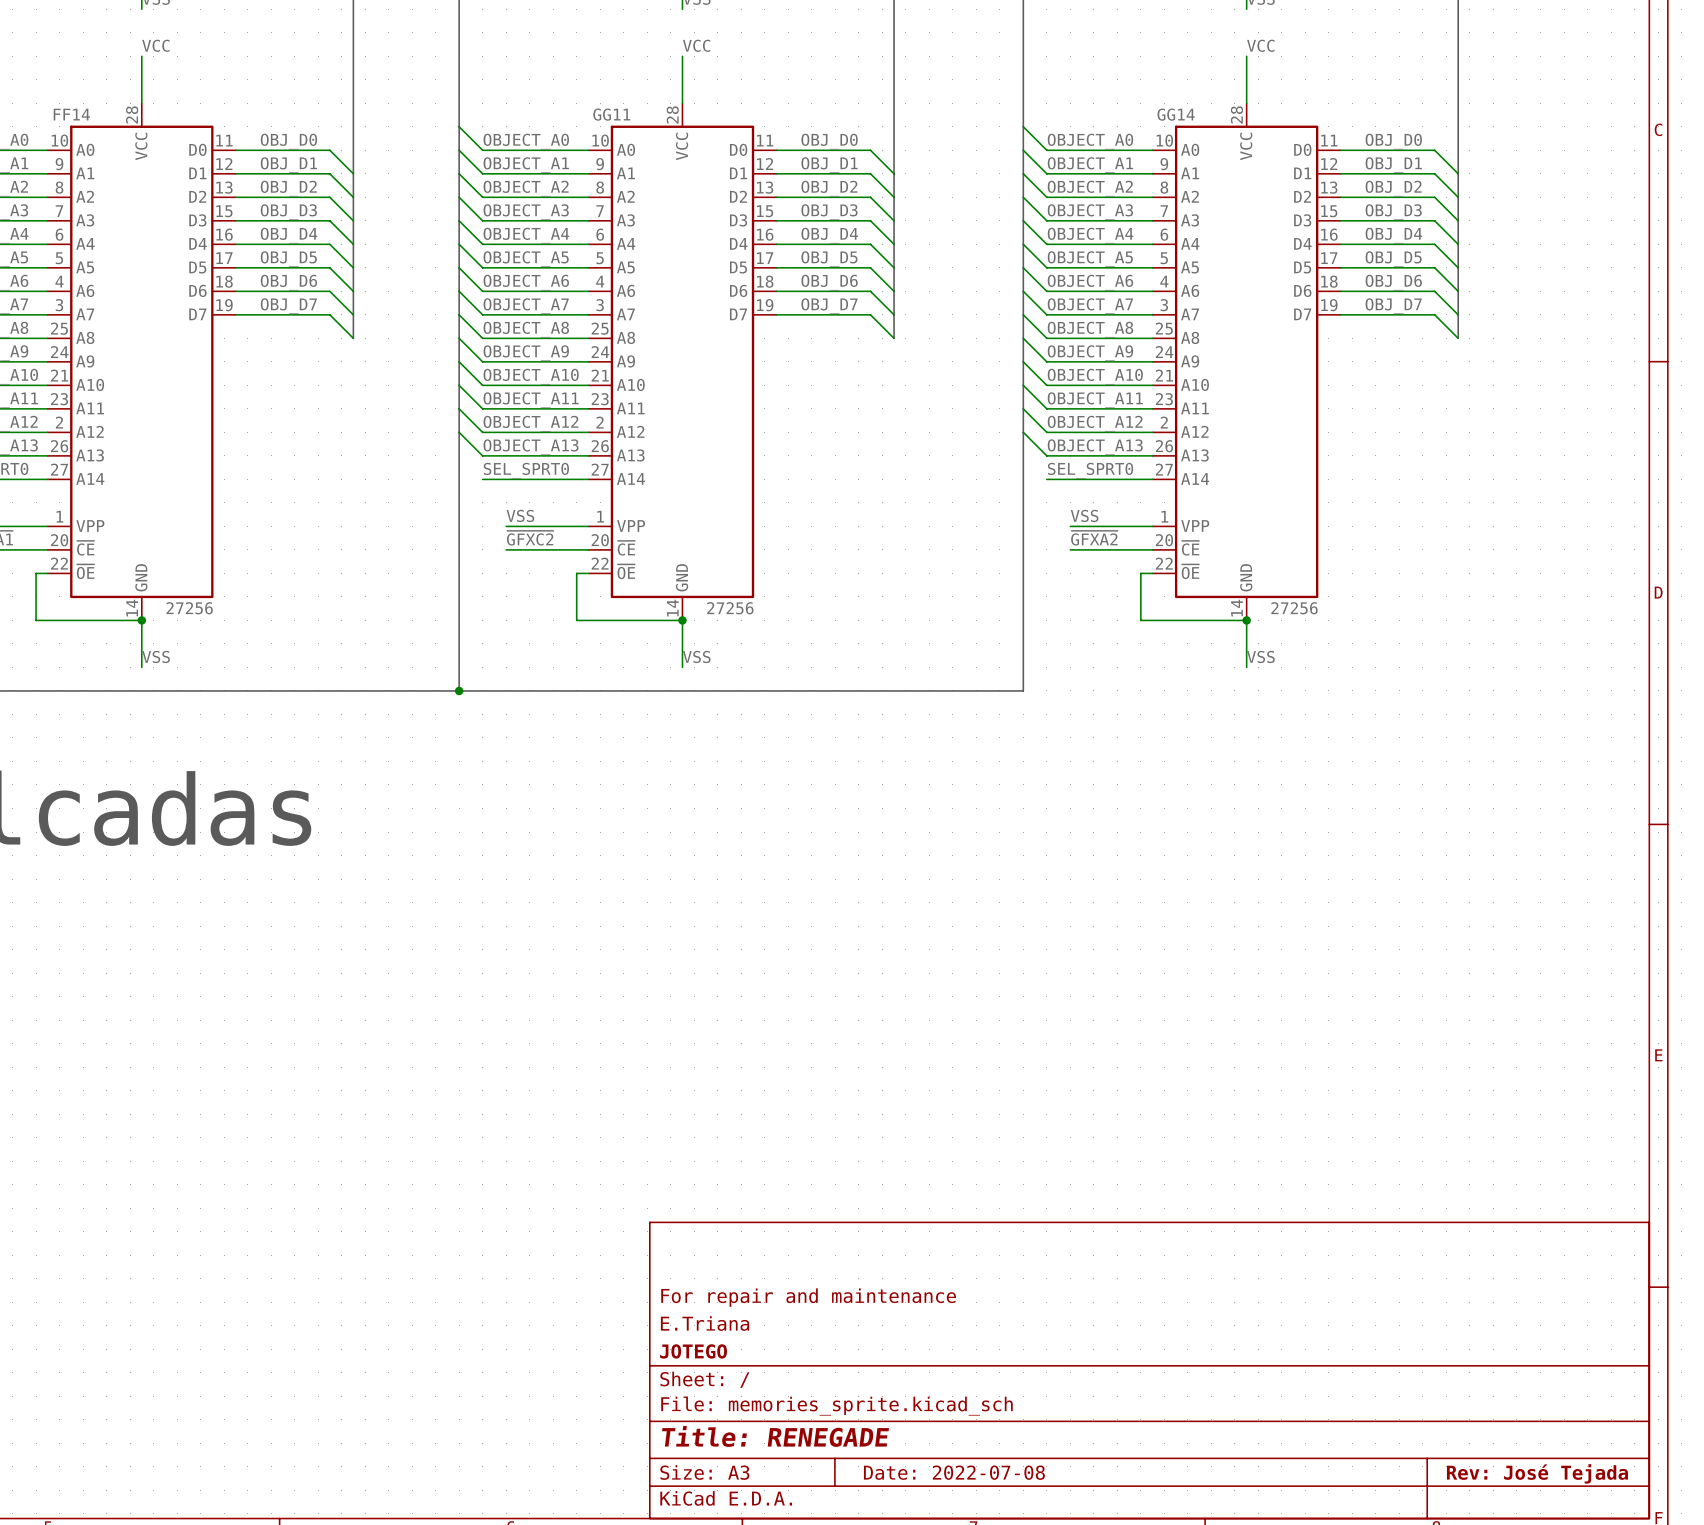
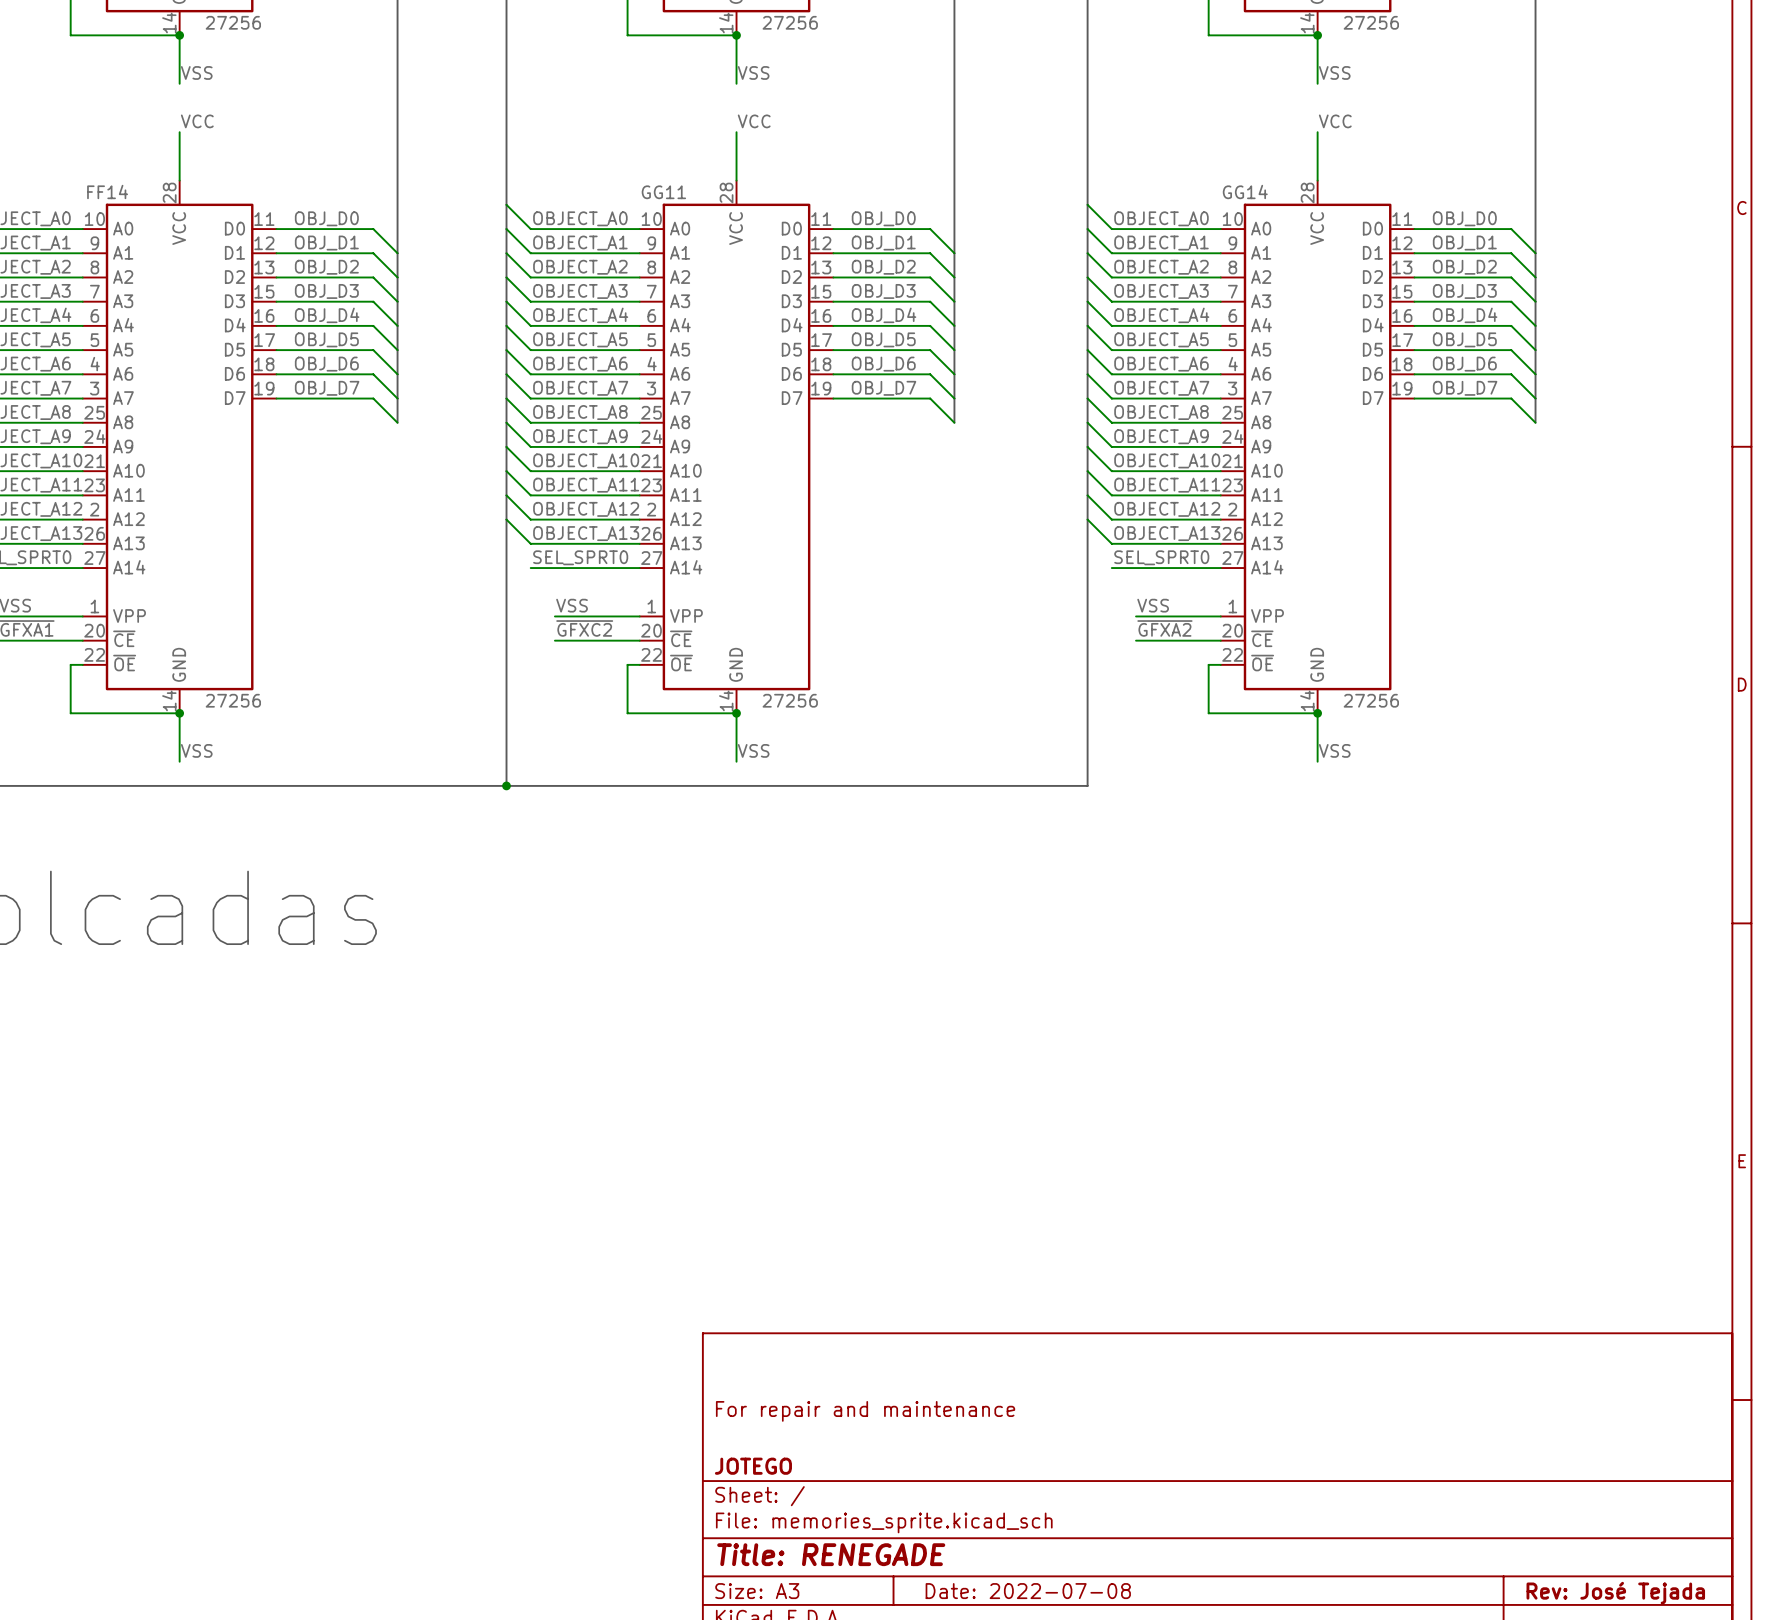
title block: E.Triana (705, 1323) -> none

